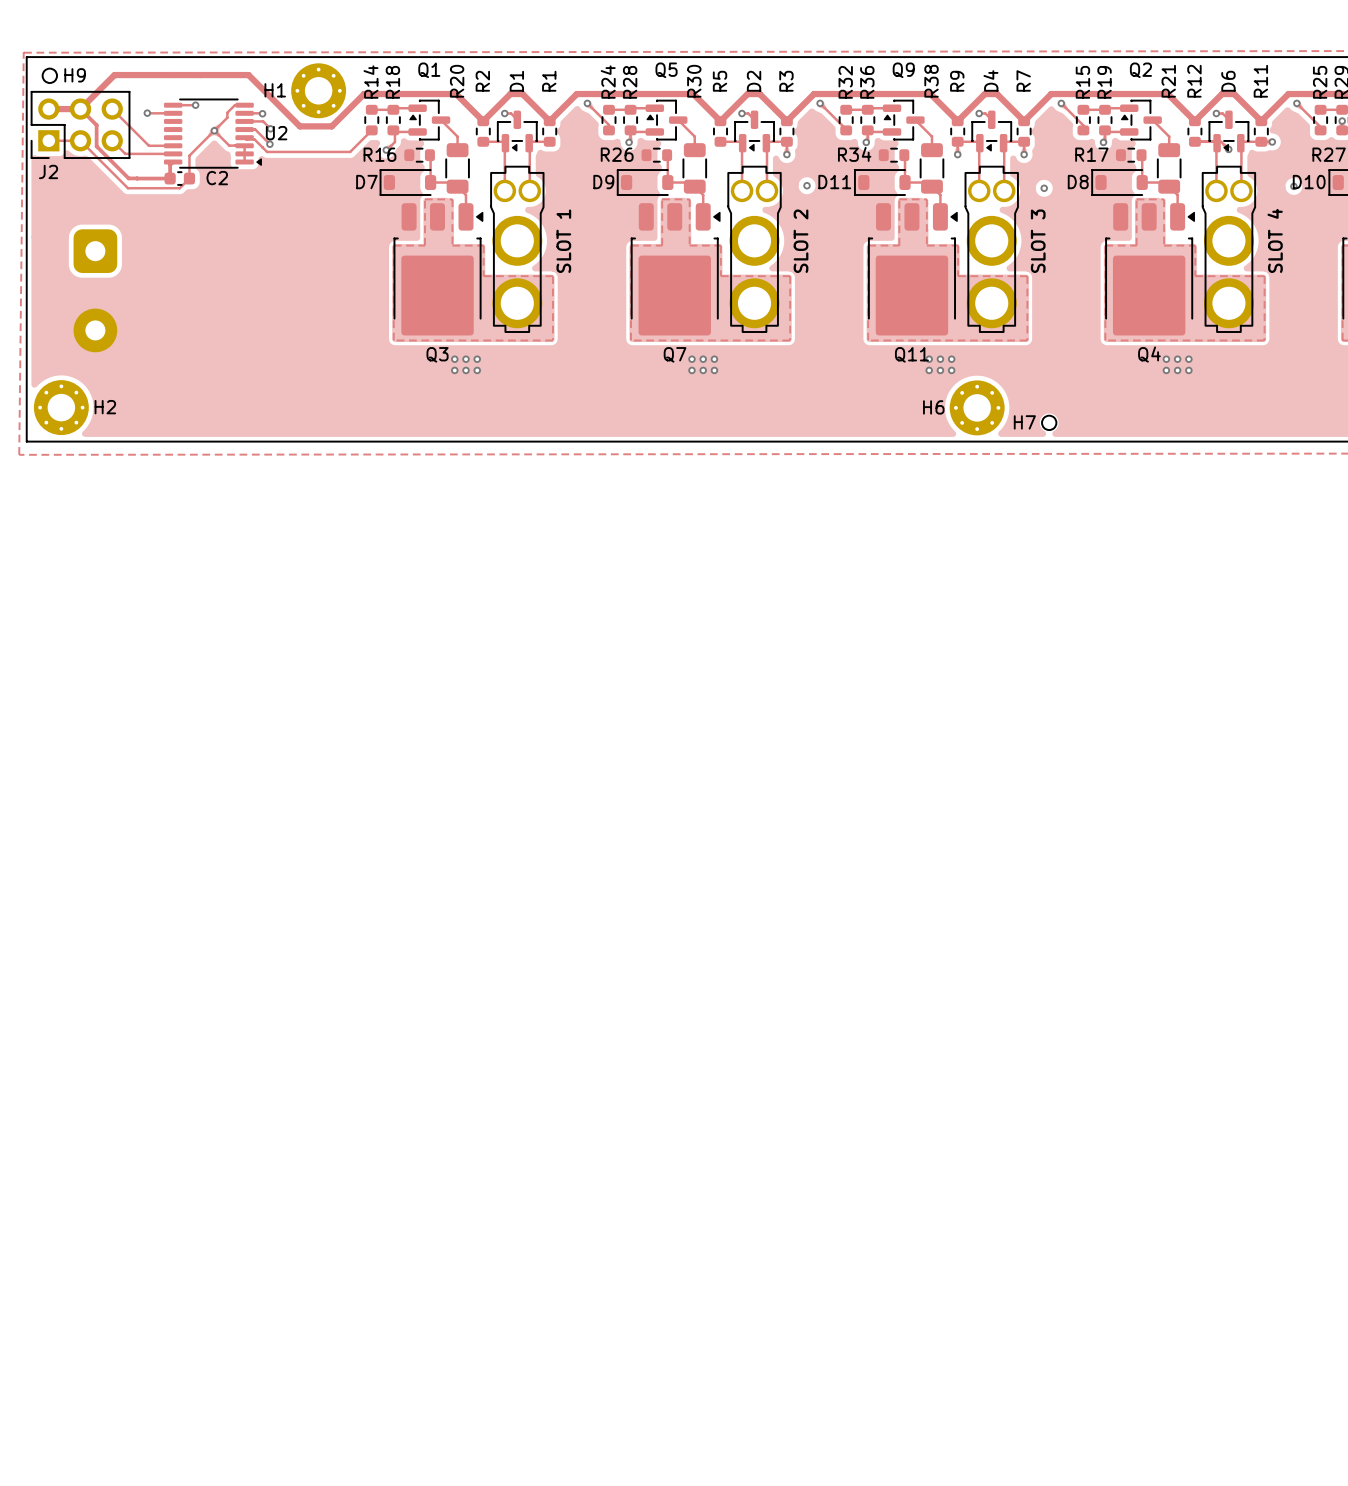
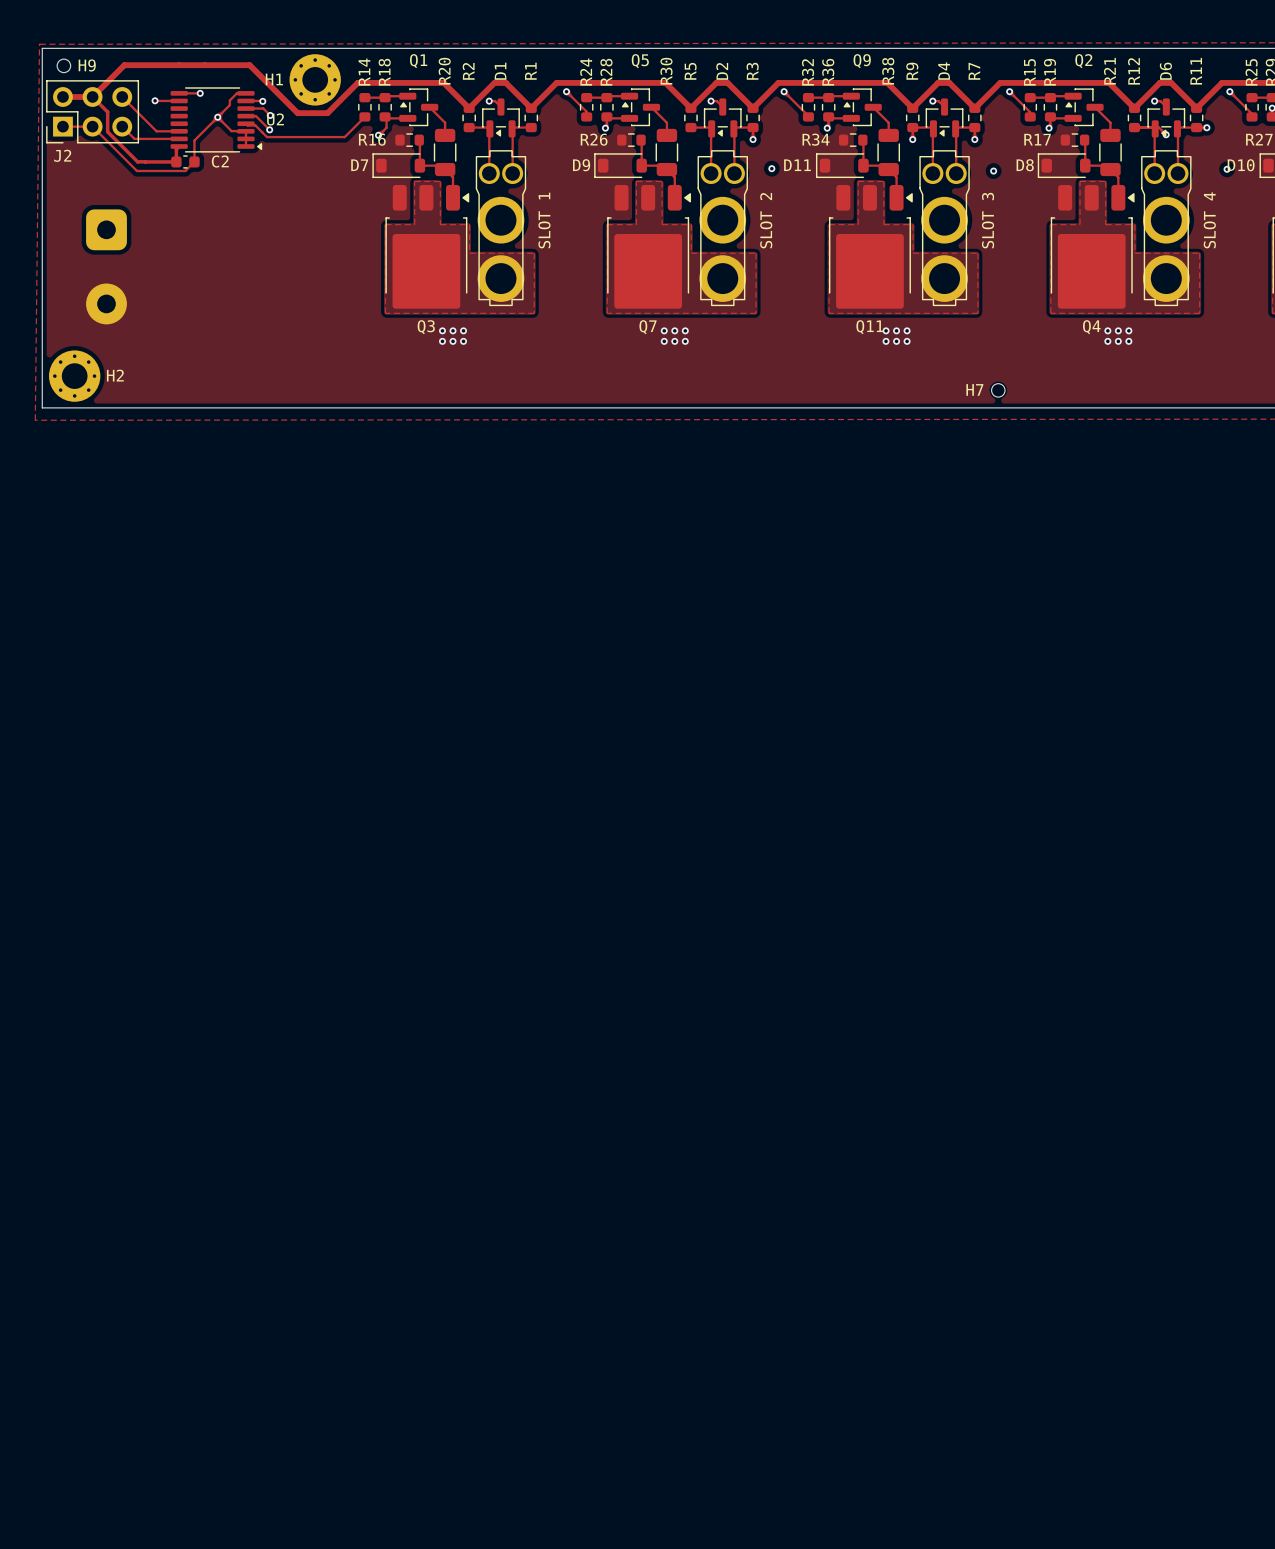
H6: (977, 407) -> none

